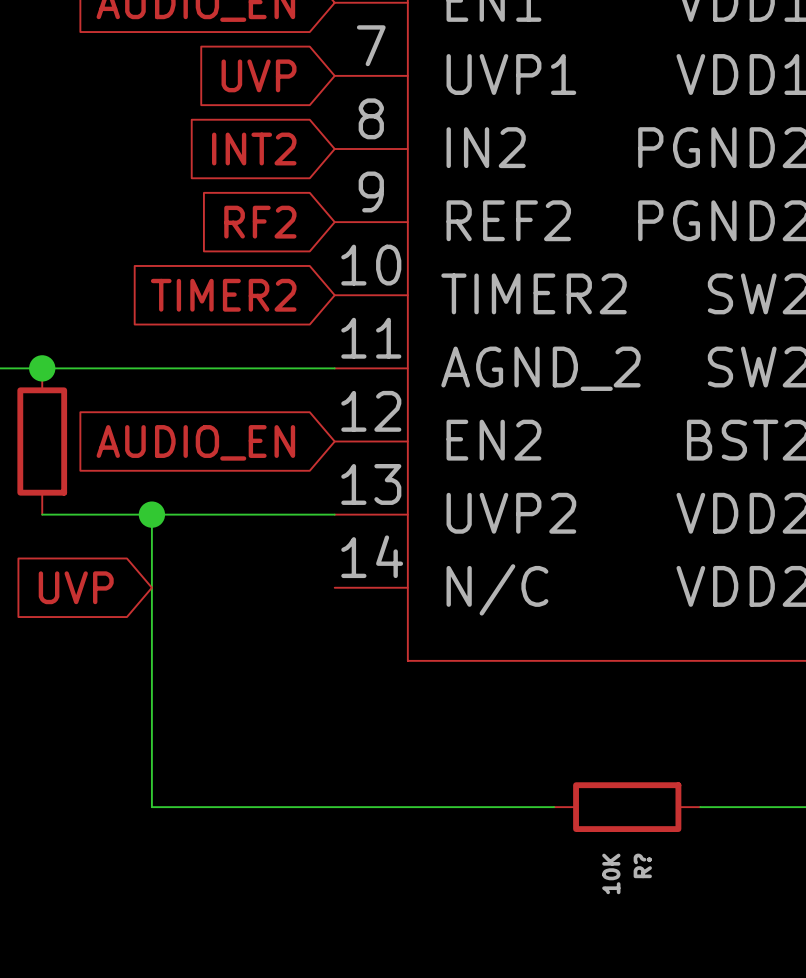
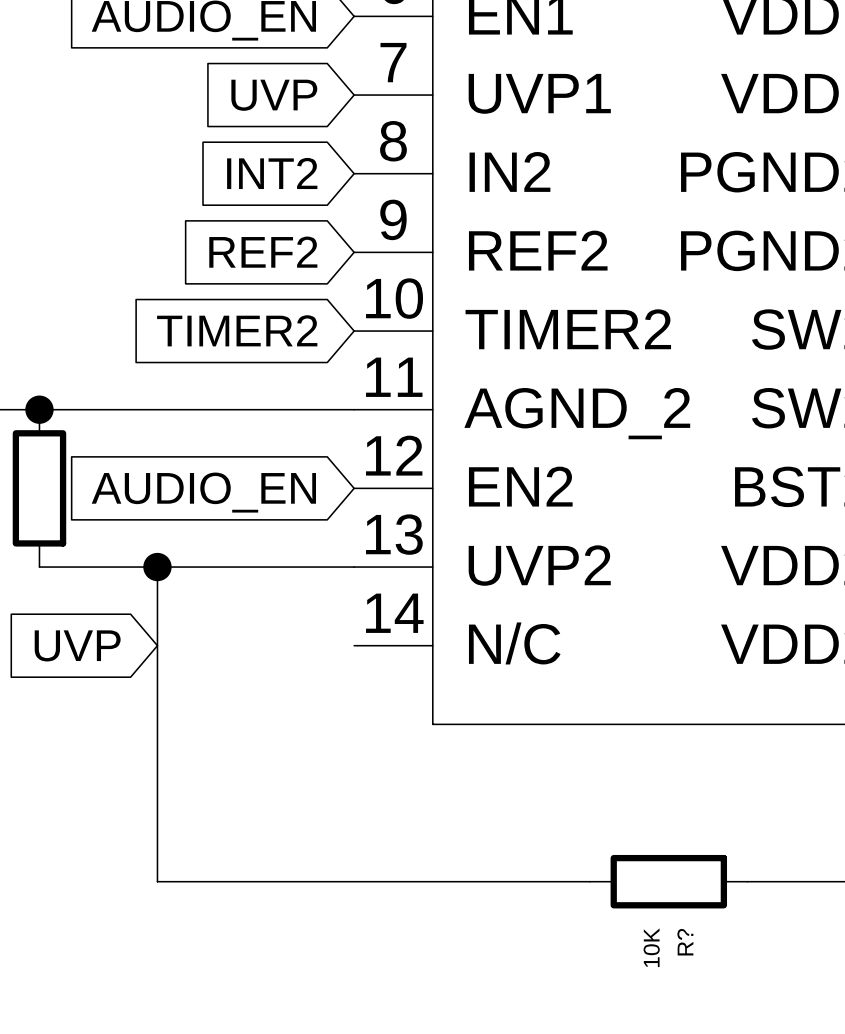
global label: RF2 (260, 222) -> REF2 (263, 252)

